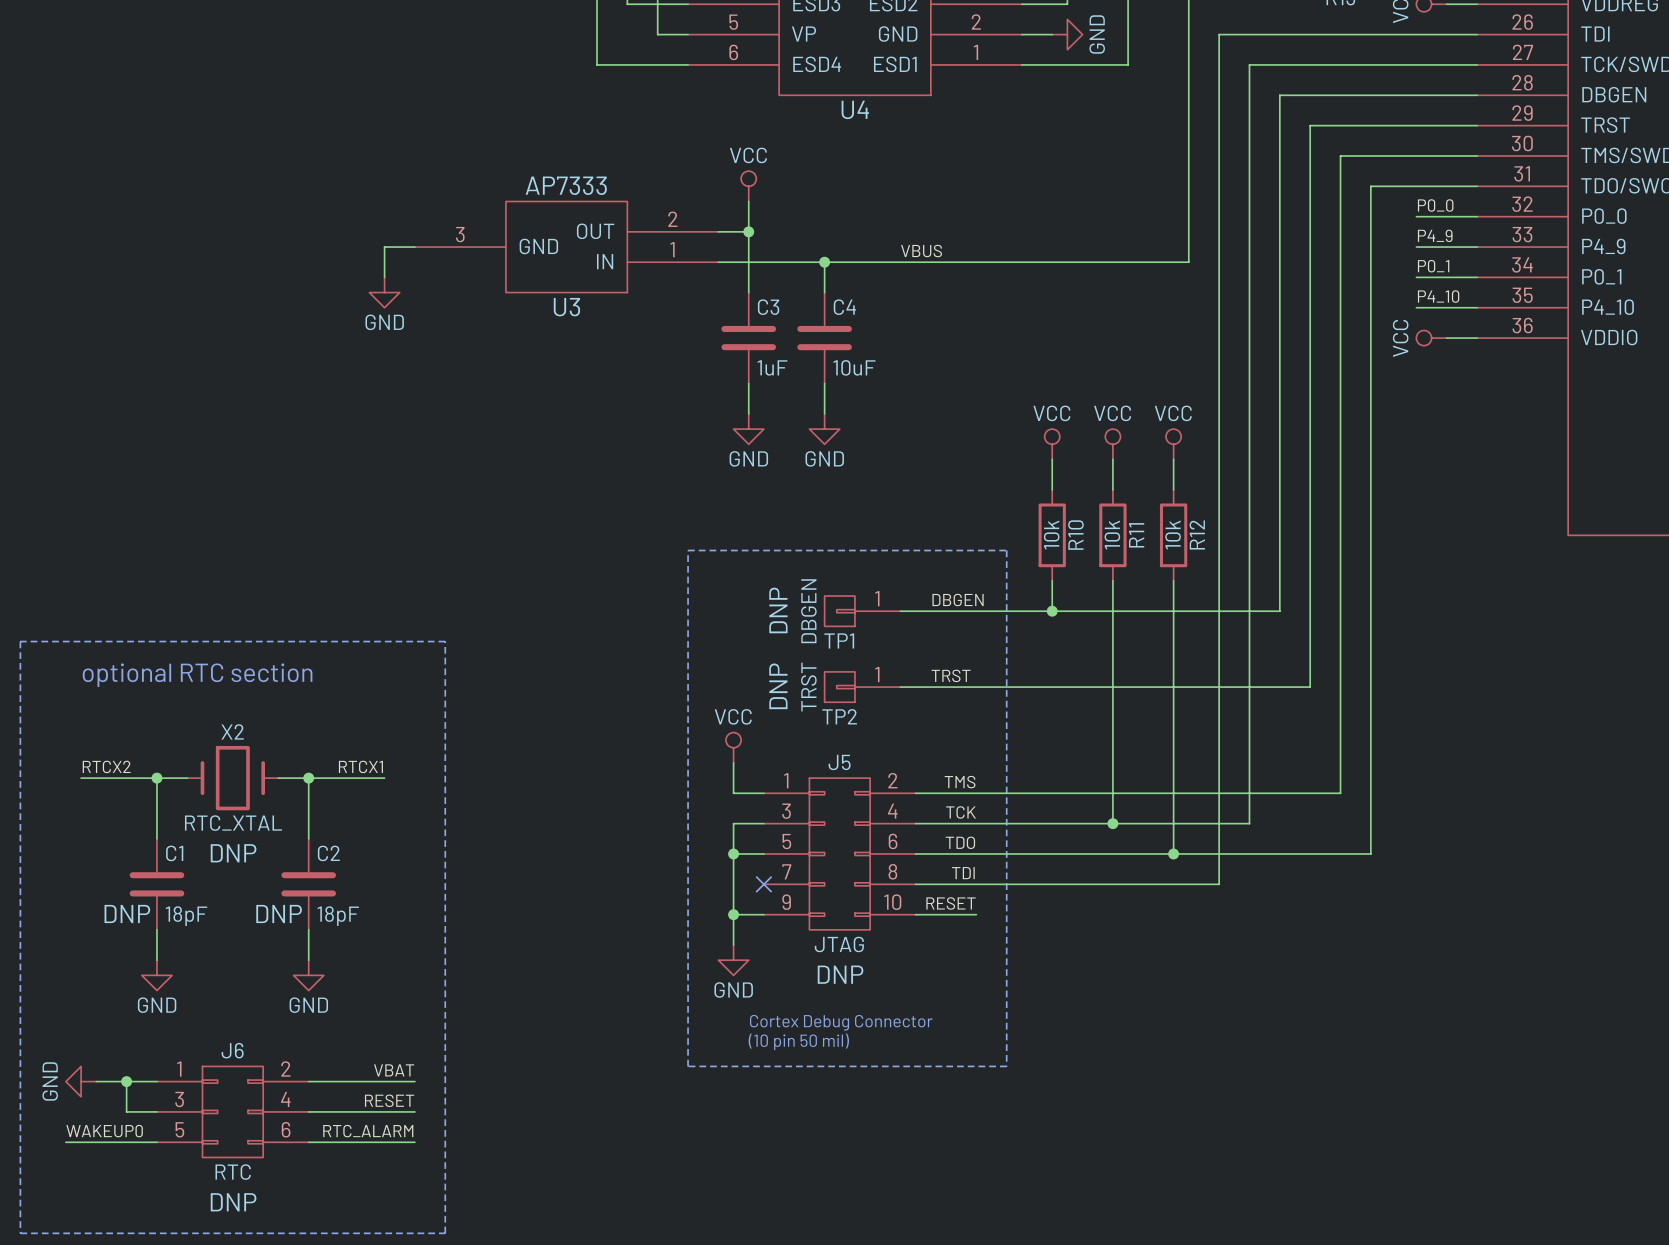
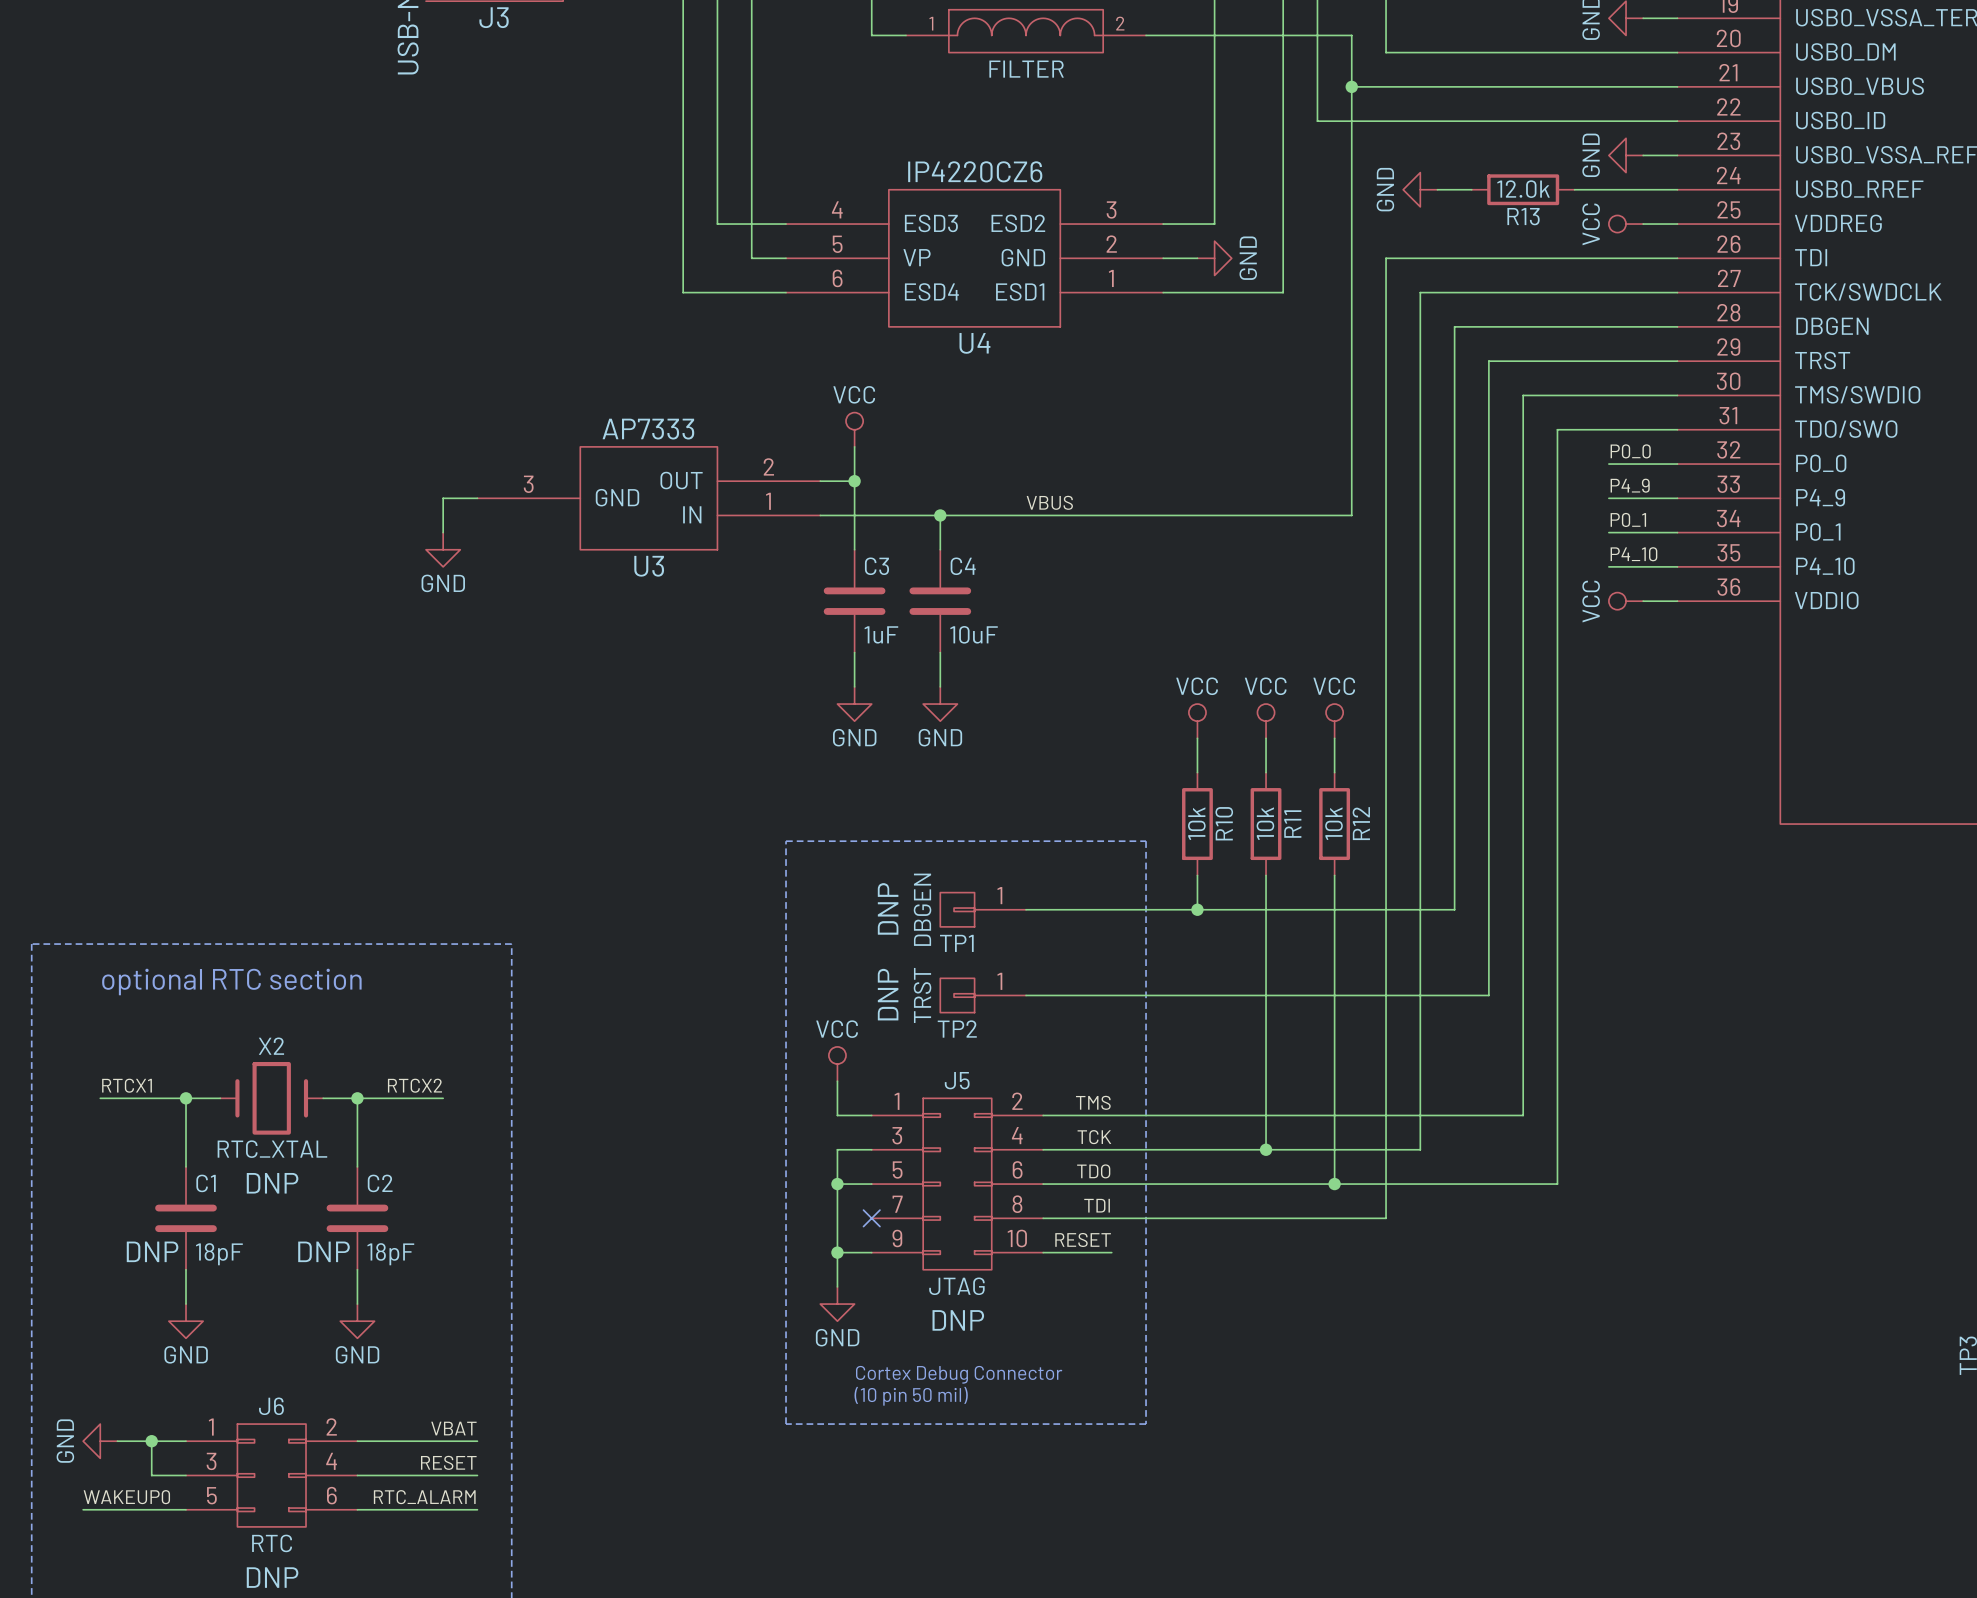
label: DBGEN (958, 600) -> none
label: TRST (951, 675) -> none
label: RTCX2 (106, 766) -> RTCX1 (127, 1085)
label: RTCX1 (360, 766) -> RTCX2 (414, 1085)

